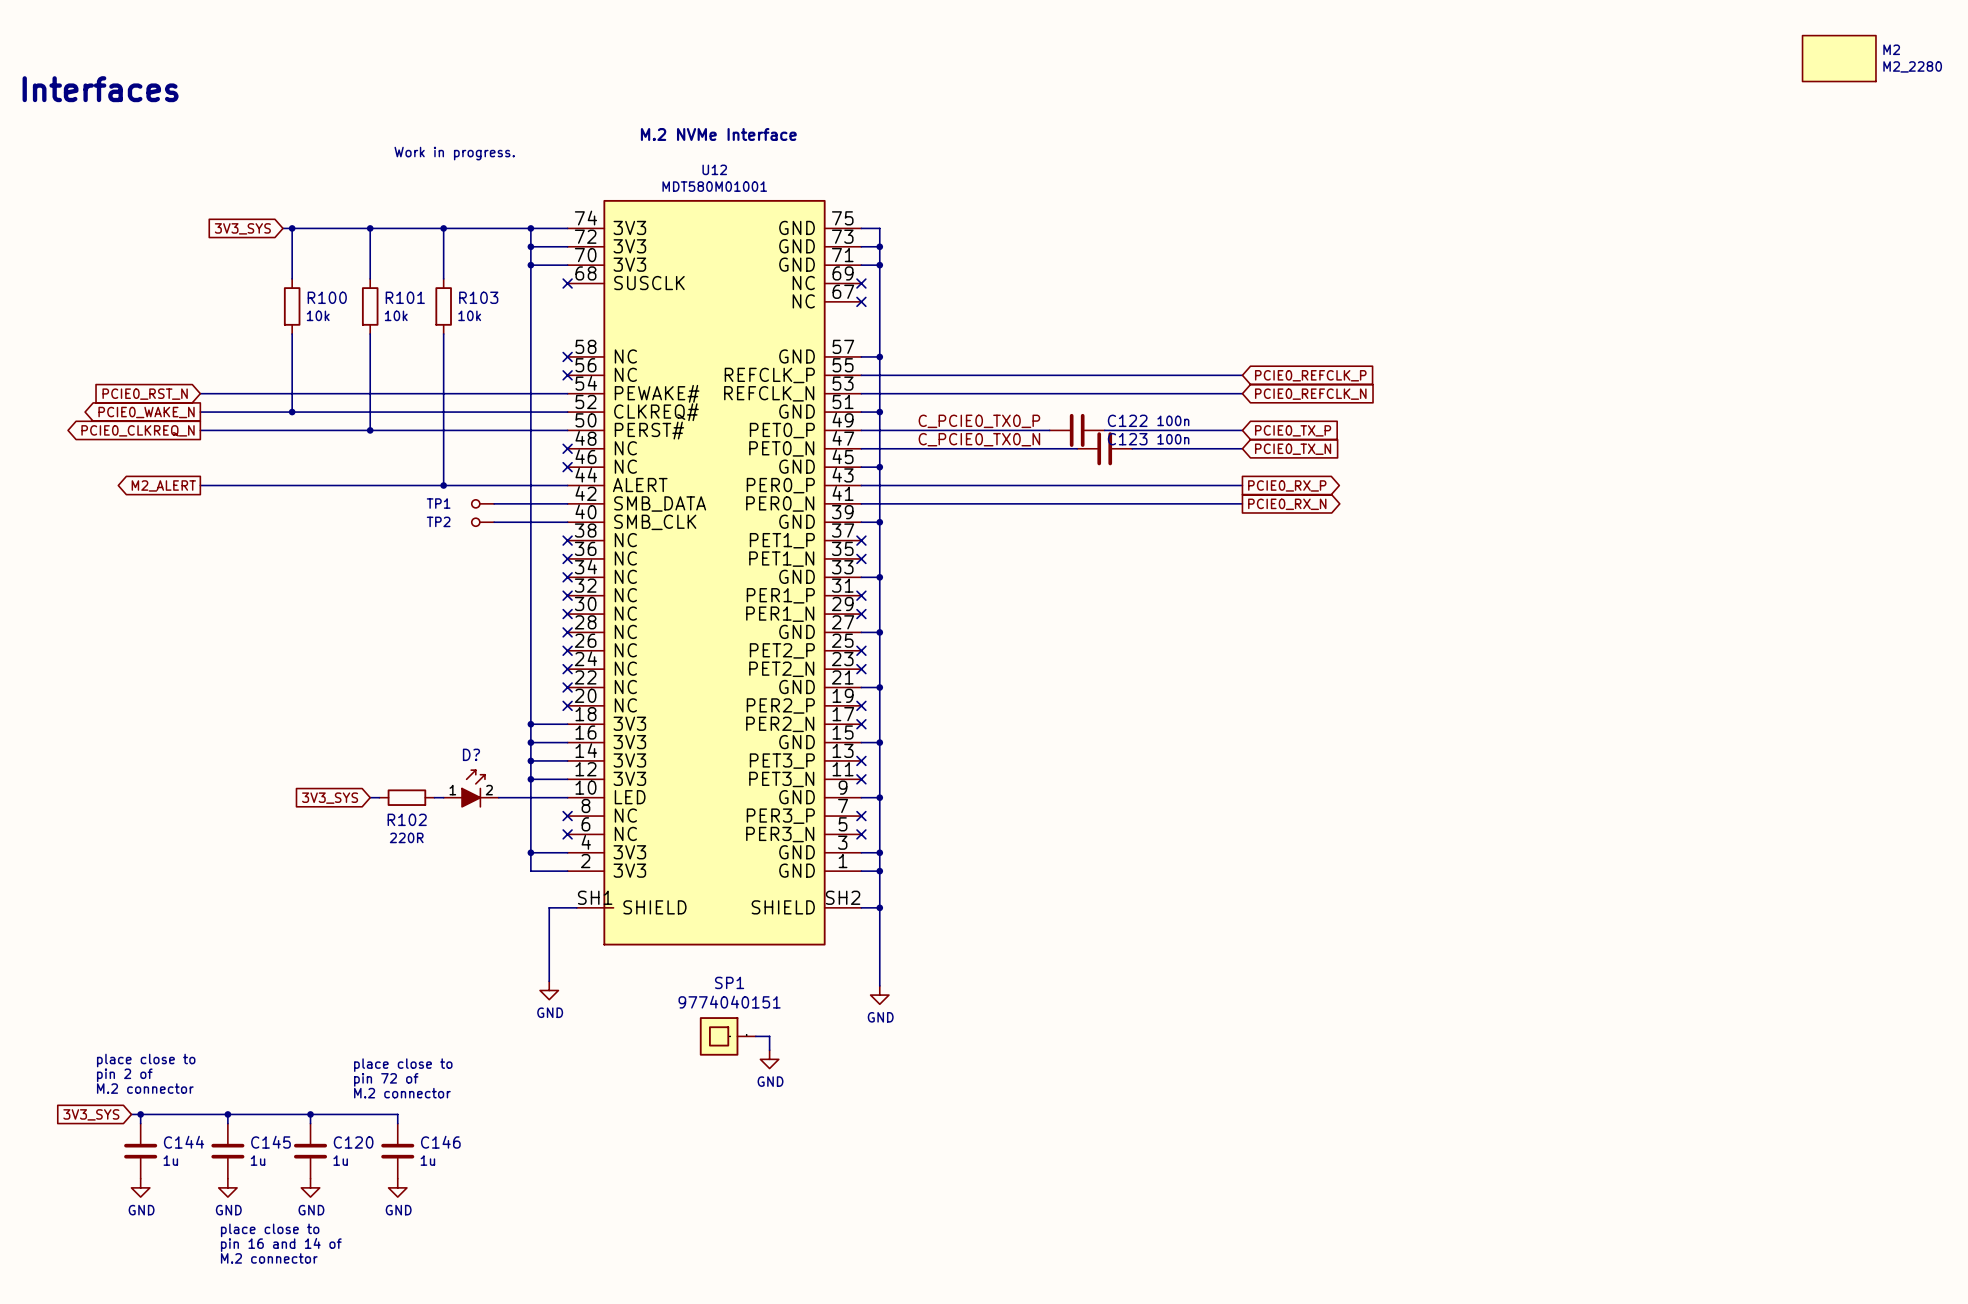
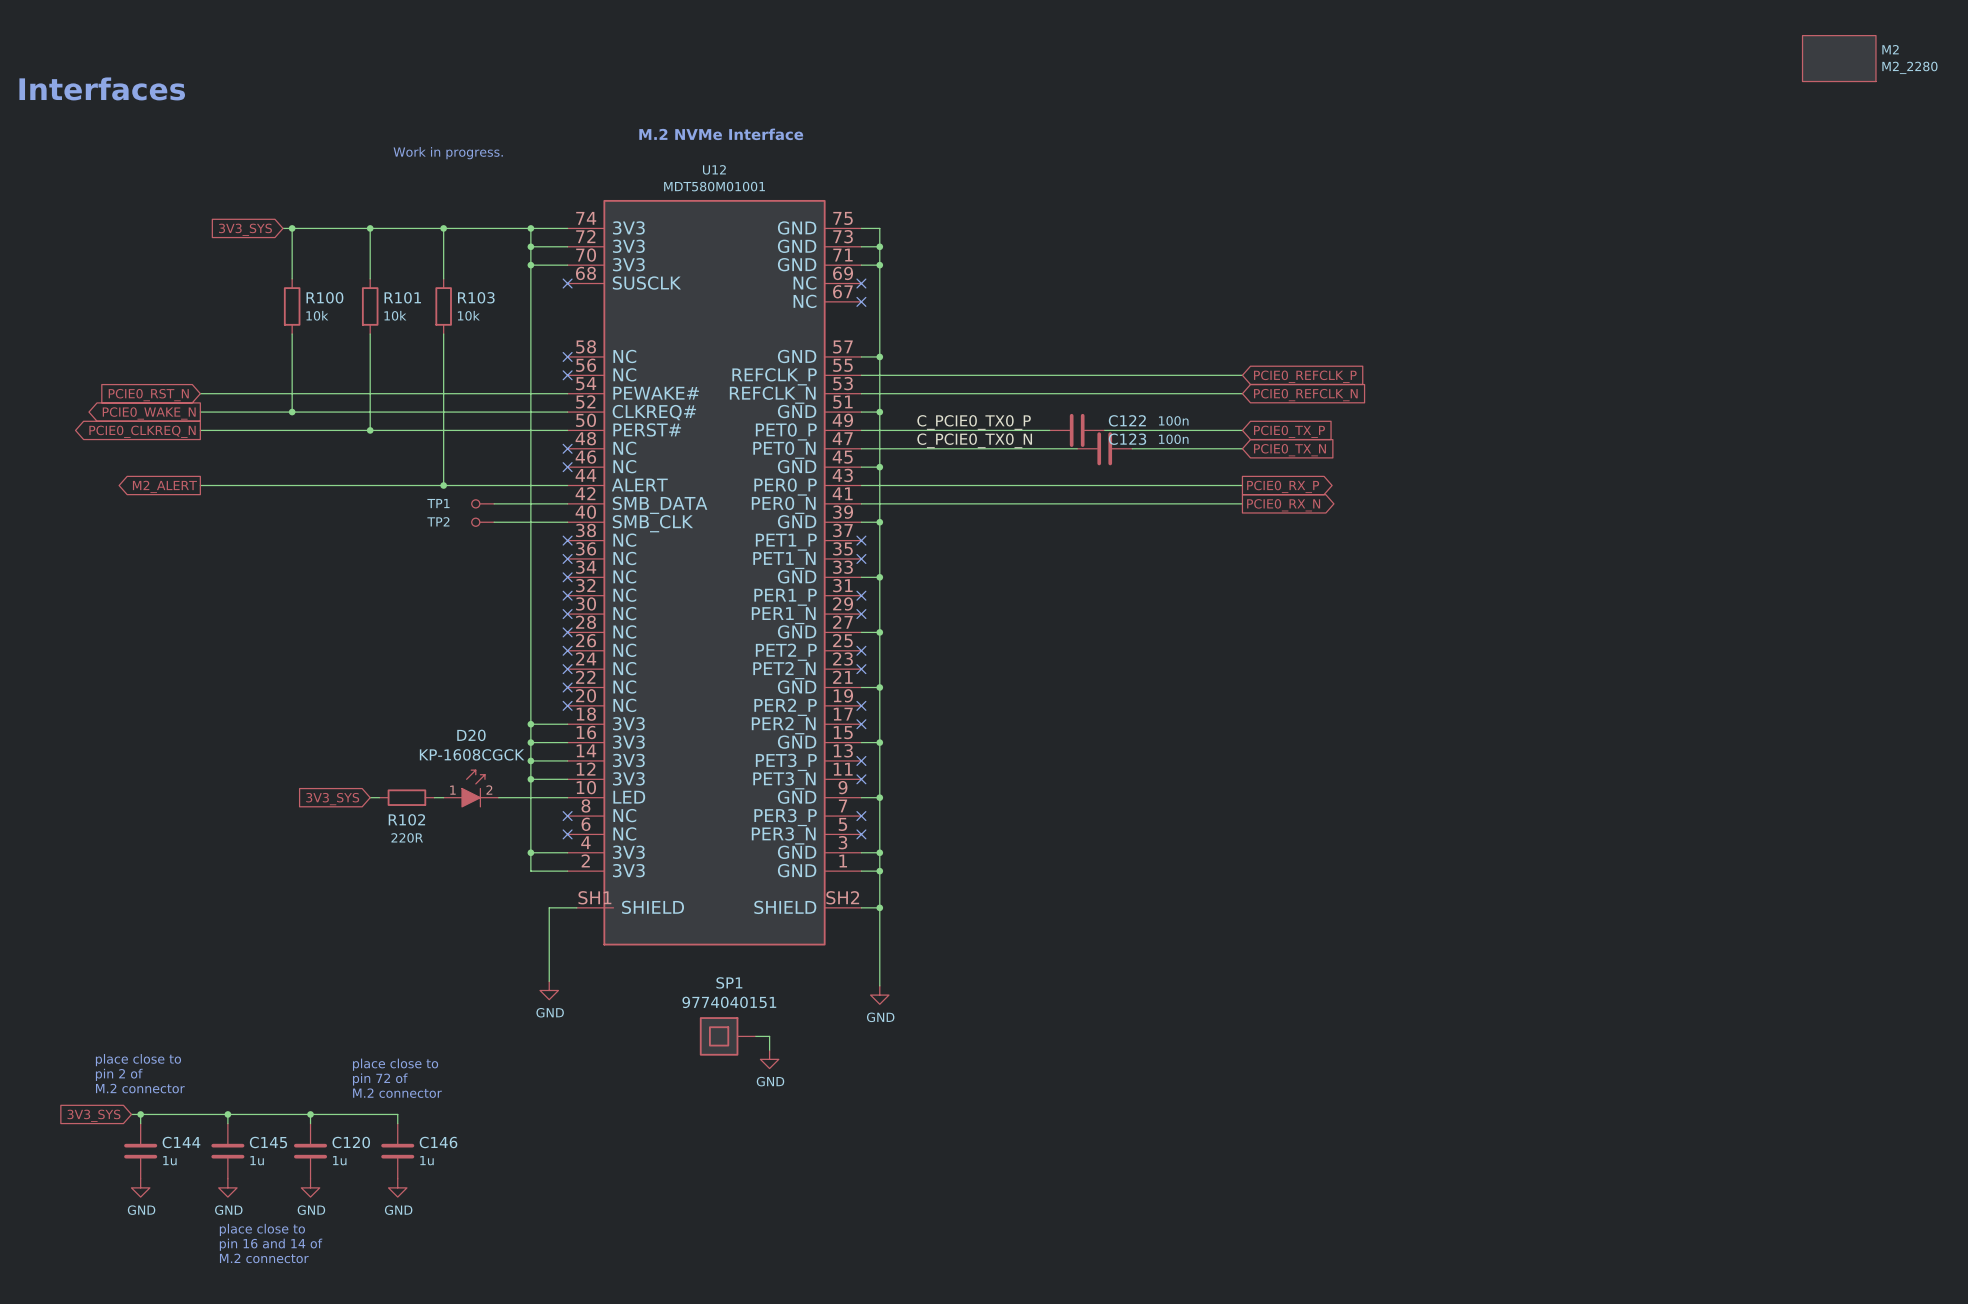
D? name: D? (471, 754) -> D20 (471, 735)
D? value: none -> KP-1608CGCK (472, 754)

